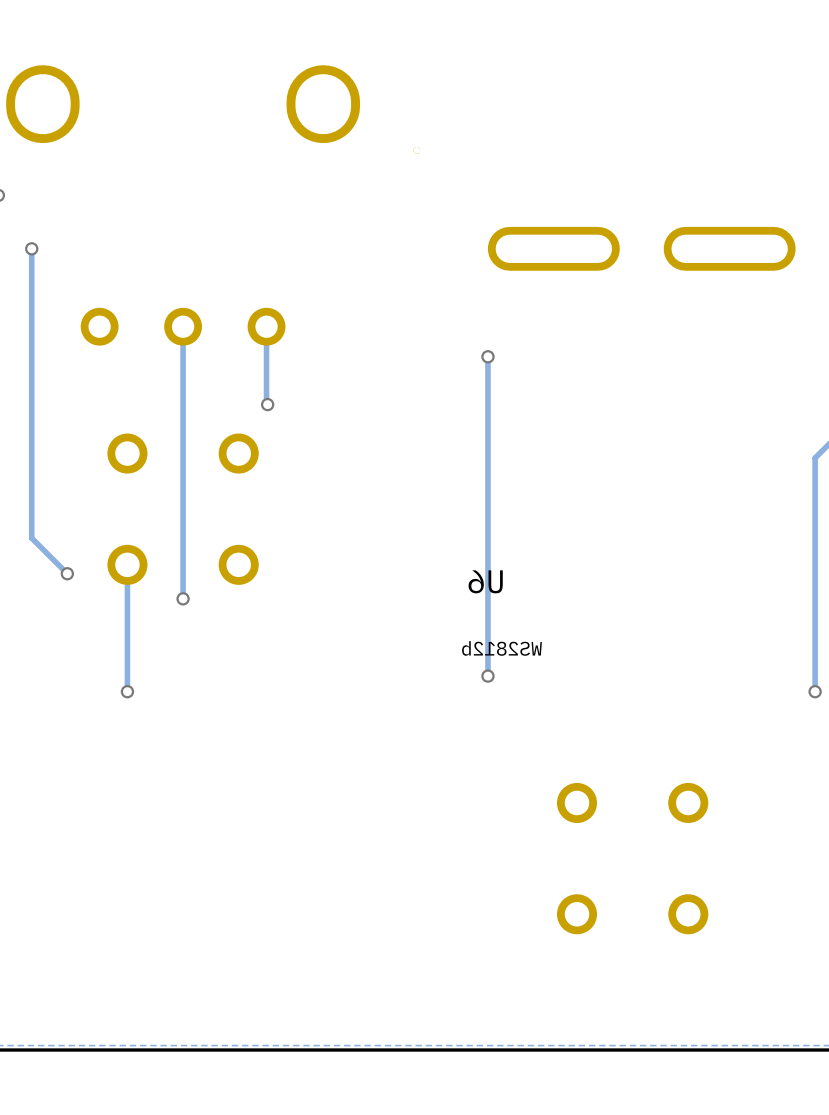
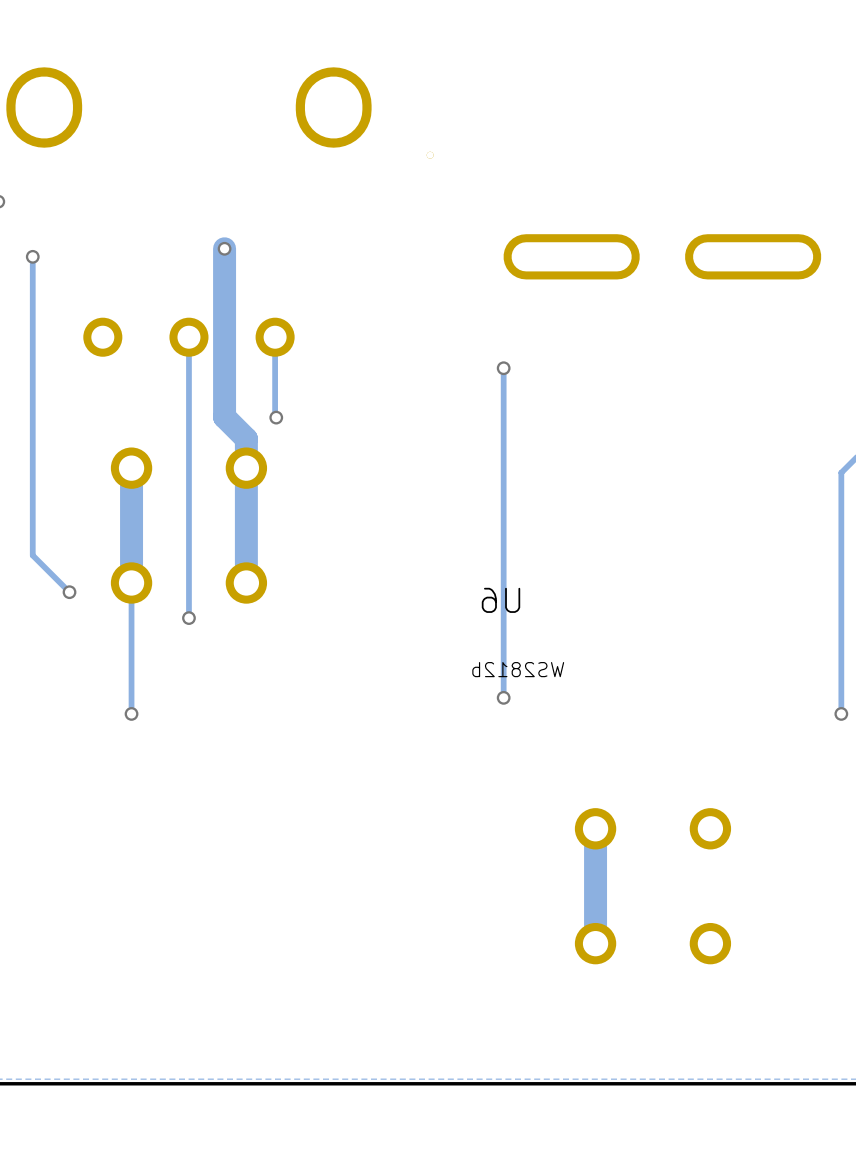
track: none -> (224, 248) (224, 417) (246, 438) (246, 583)
via: none -> (224, 248)
track: none -> (131, 468) (131, 583)
track: none -> (595, 828) (595, 943)

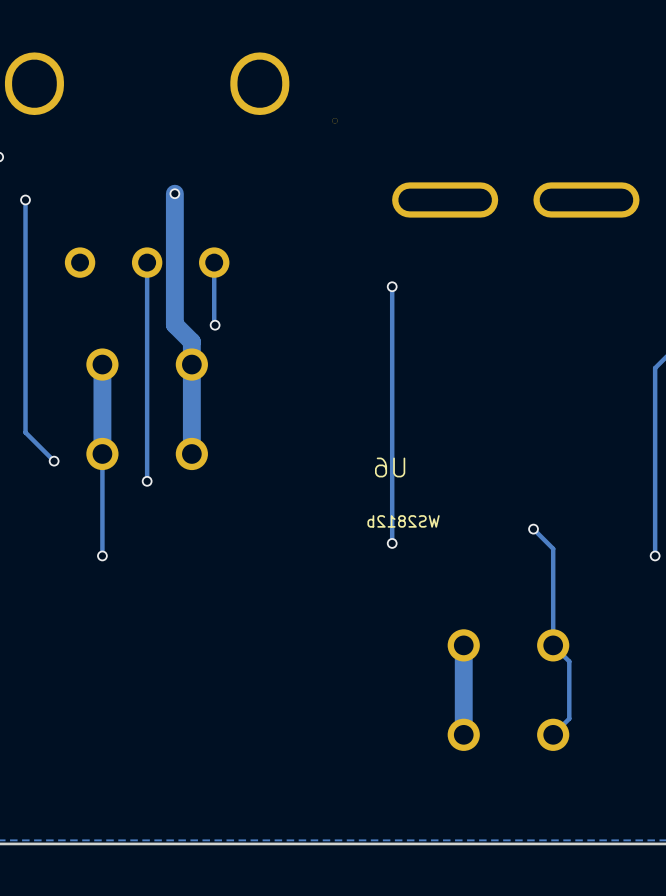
track: none -> (533, 529) (553, 548) (553, 645) (569, 661) (569, 718) (553, 734)
via: none -> (533, 529)

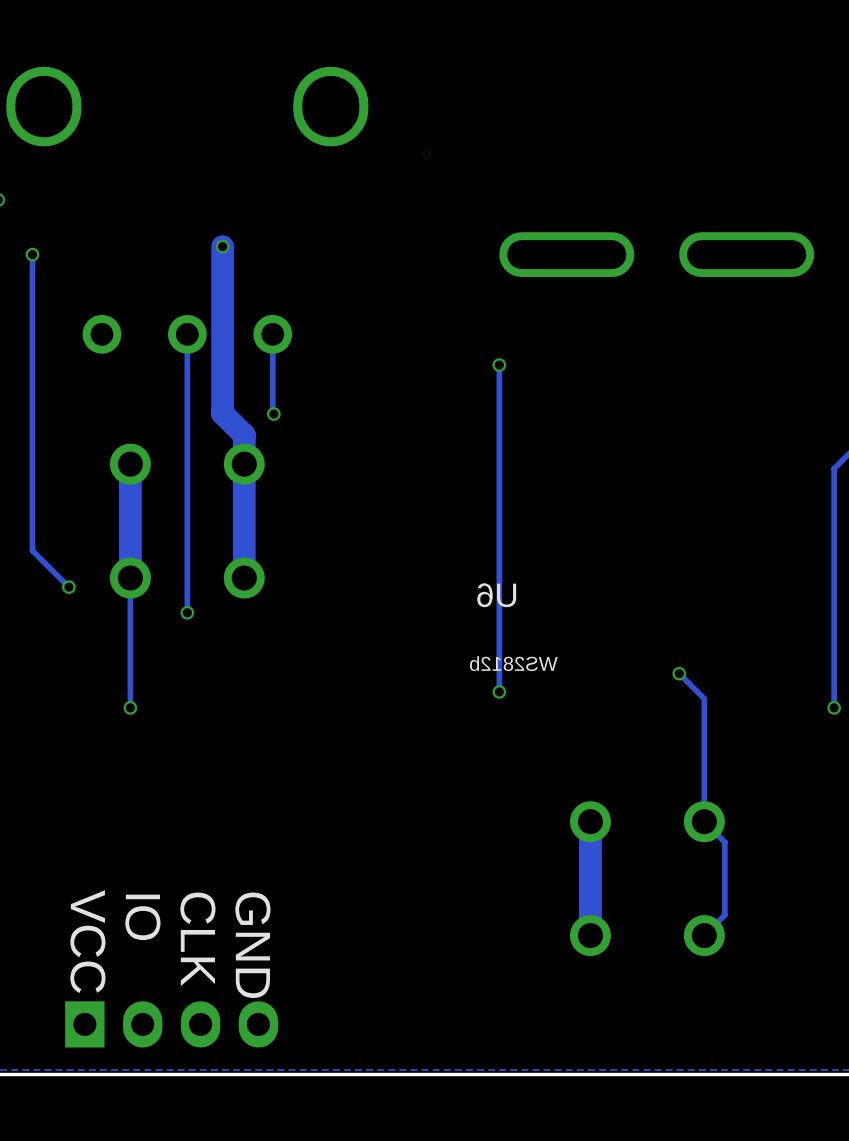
text: none -> IO (142, 917)
text: none -> VCC (87, 941)
text: none -> CLK (197, 939)
text: none -> GND (252, 945)
part: none -> (171, 1024)

